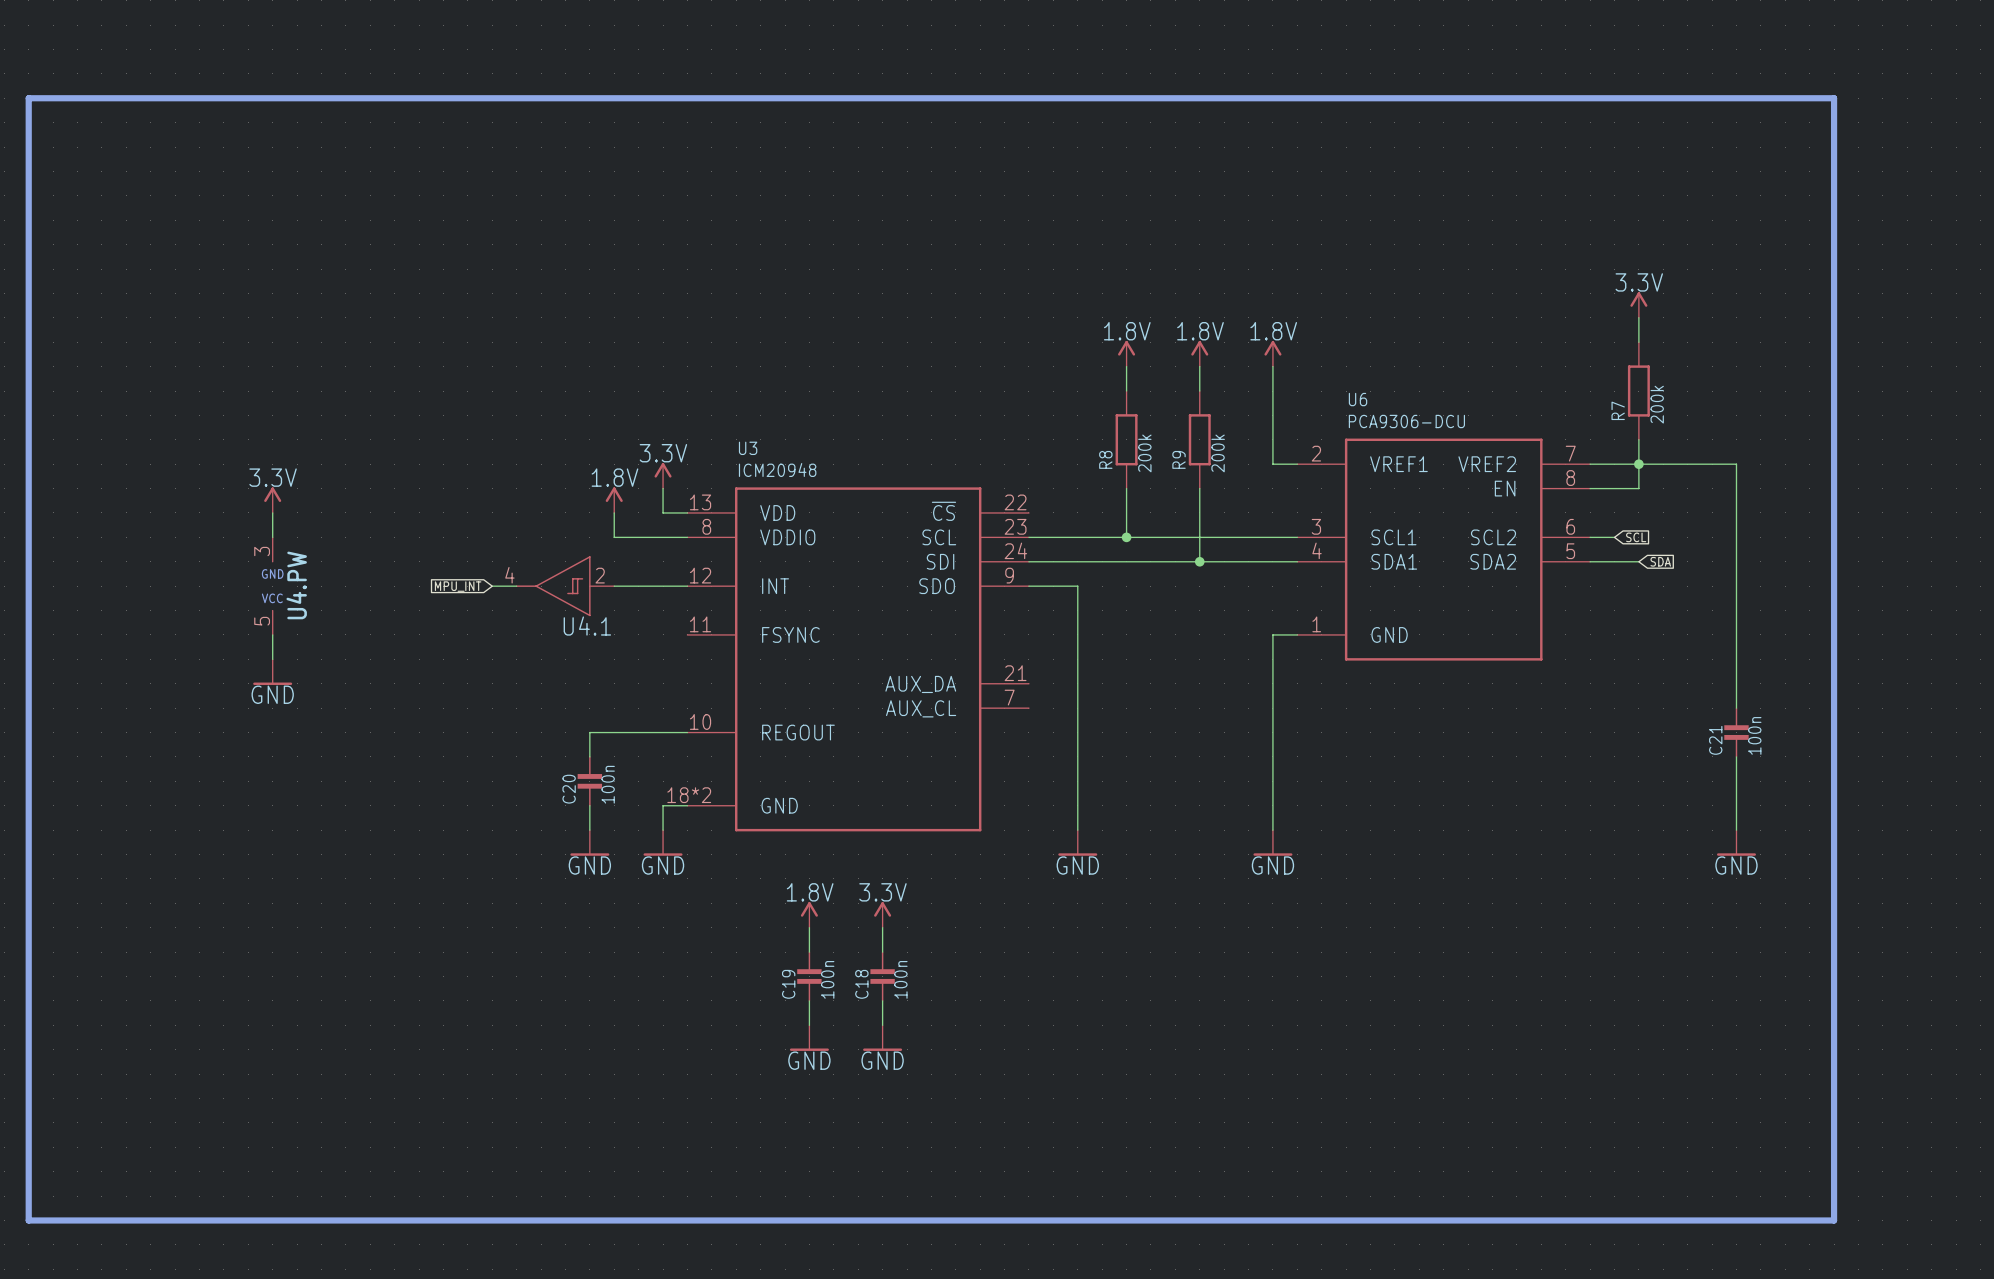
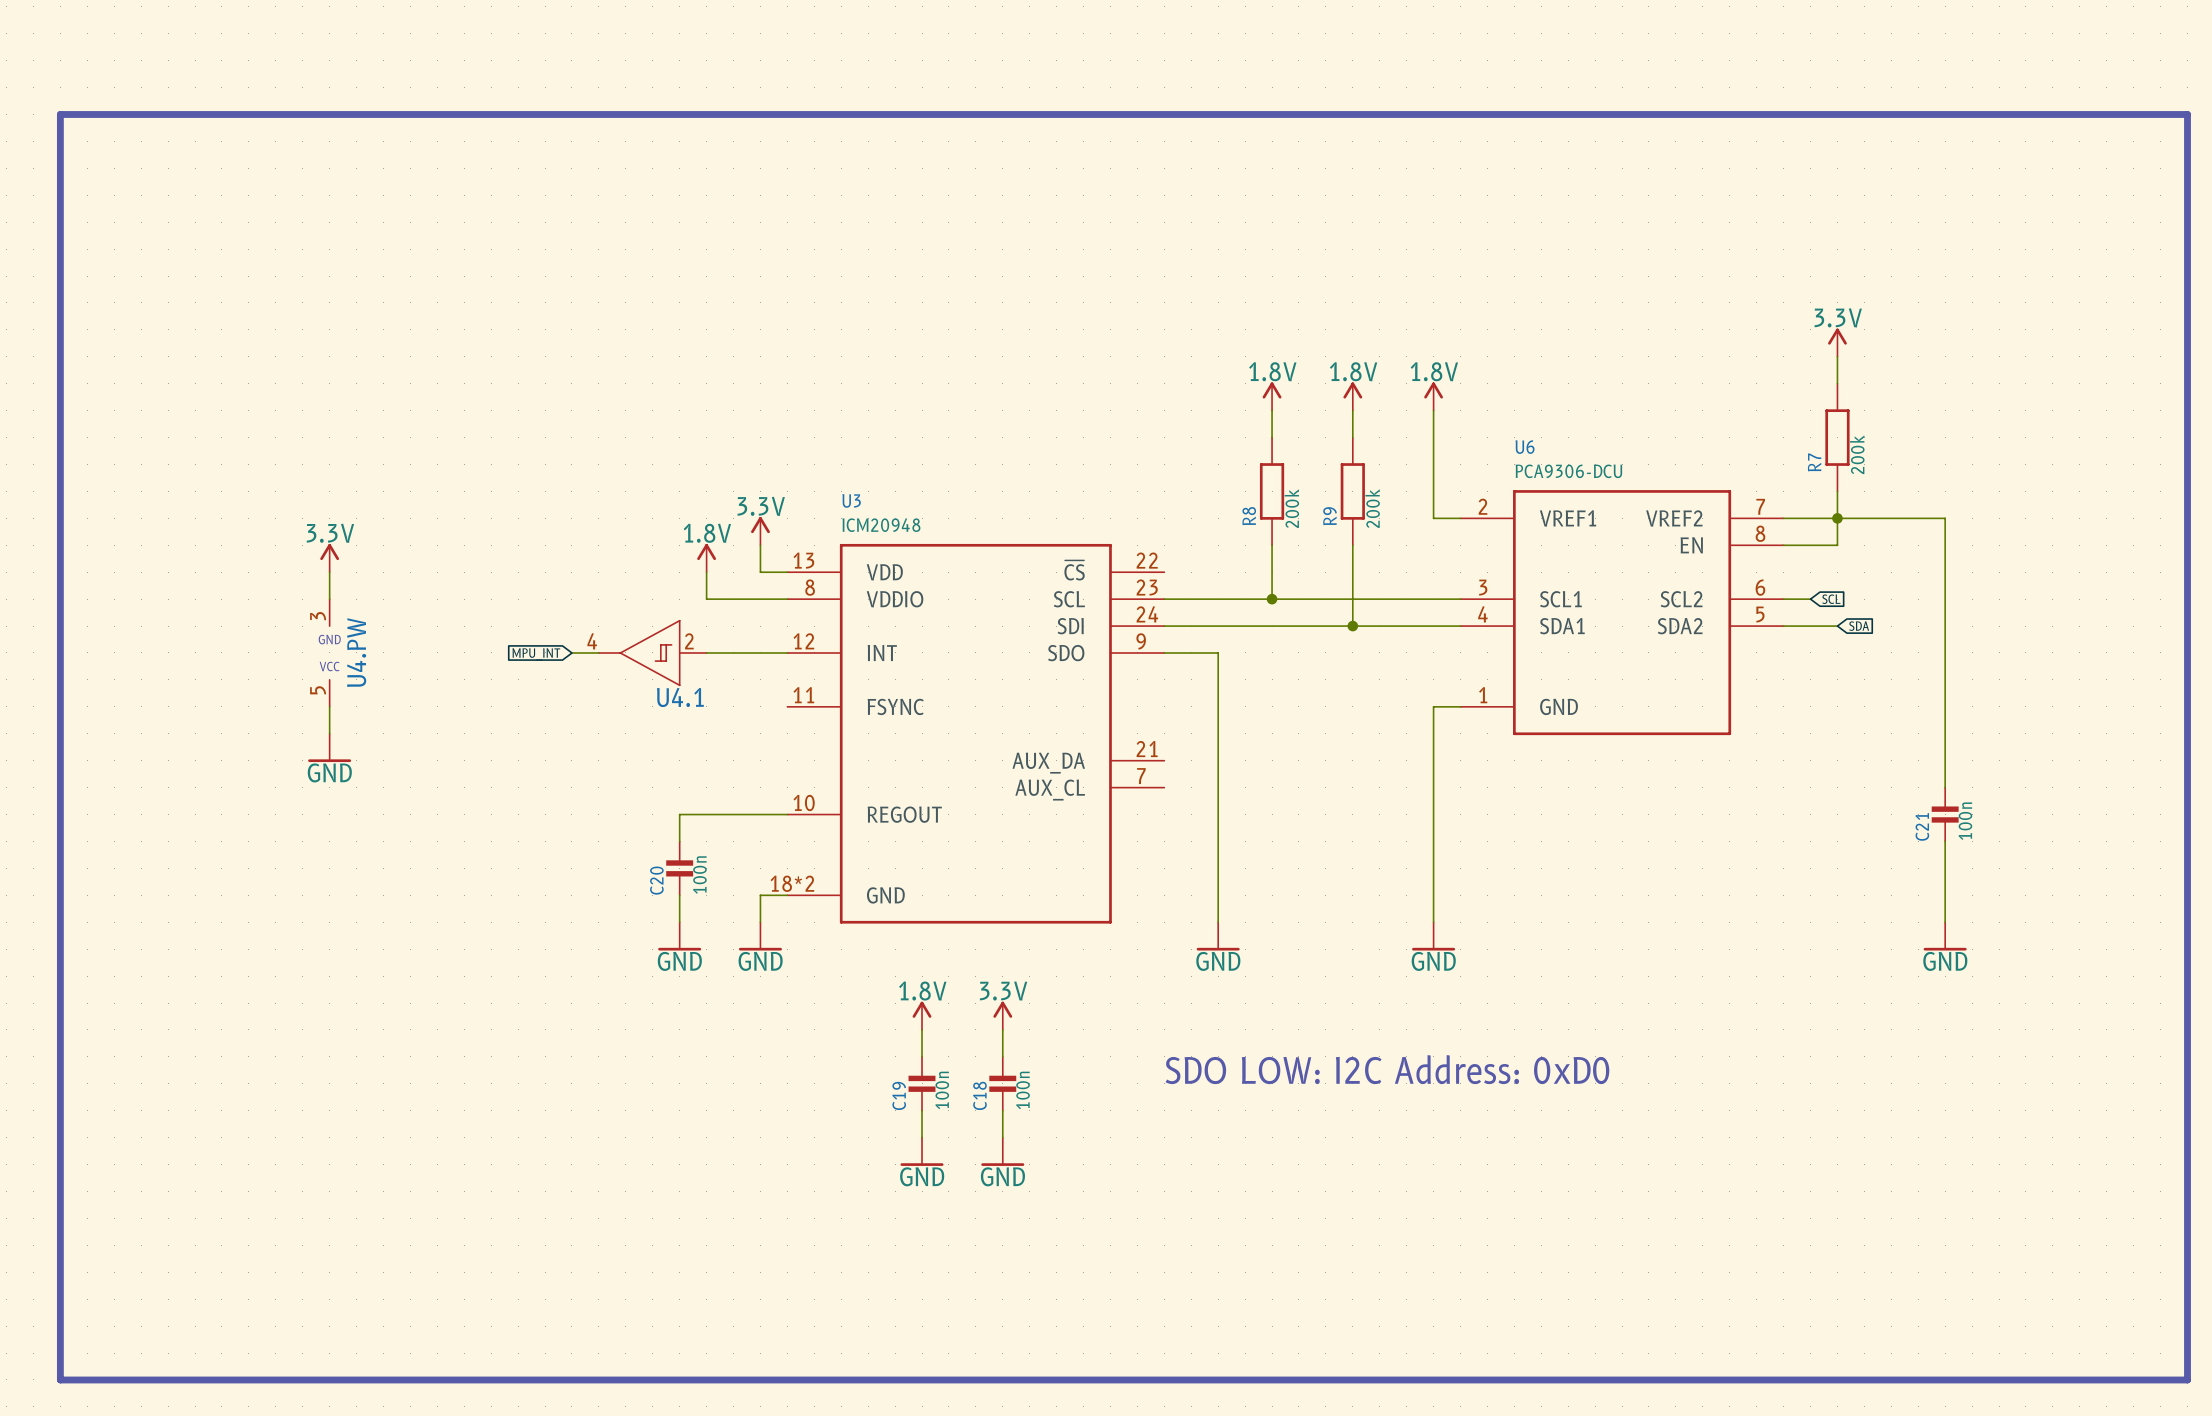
line: (1834, 98) (1834, 1220) (28, 1220) -> (2052, 114) (2187, 114) (2187, 1379) (60, 1379) (60, 1353)
text: none -> SDO LOW: I2C Address: 0xD0 (1387, 1069)

